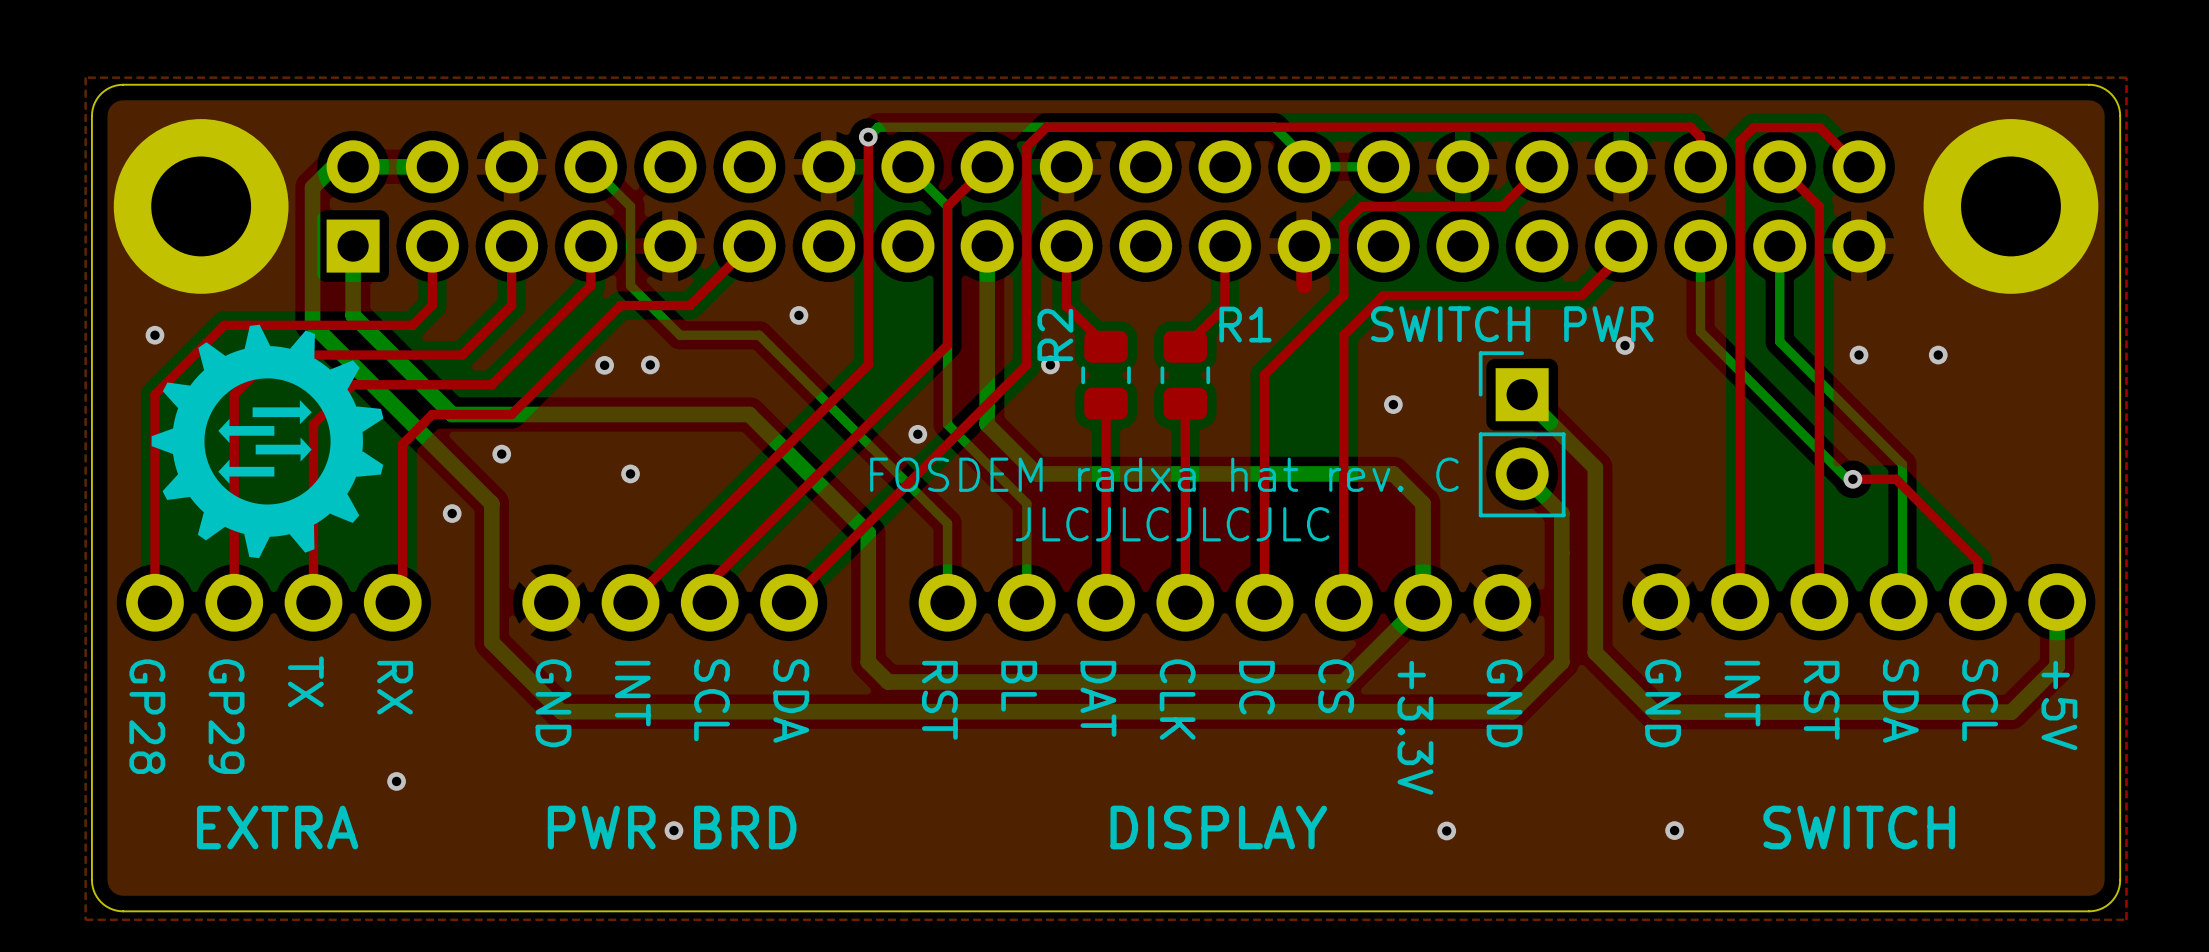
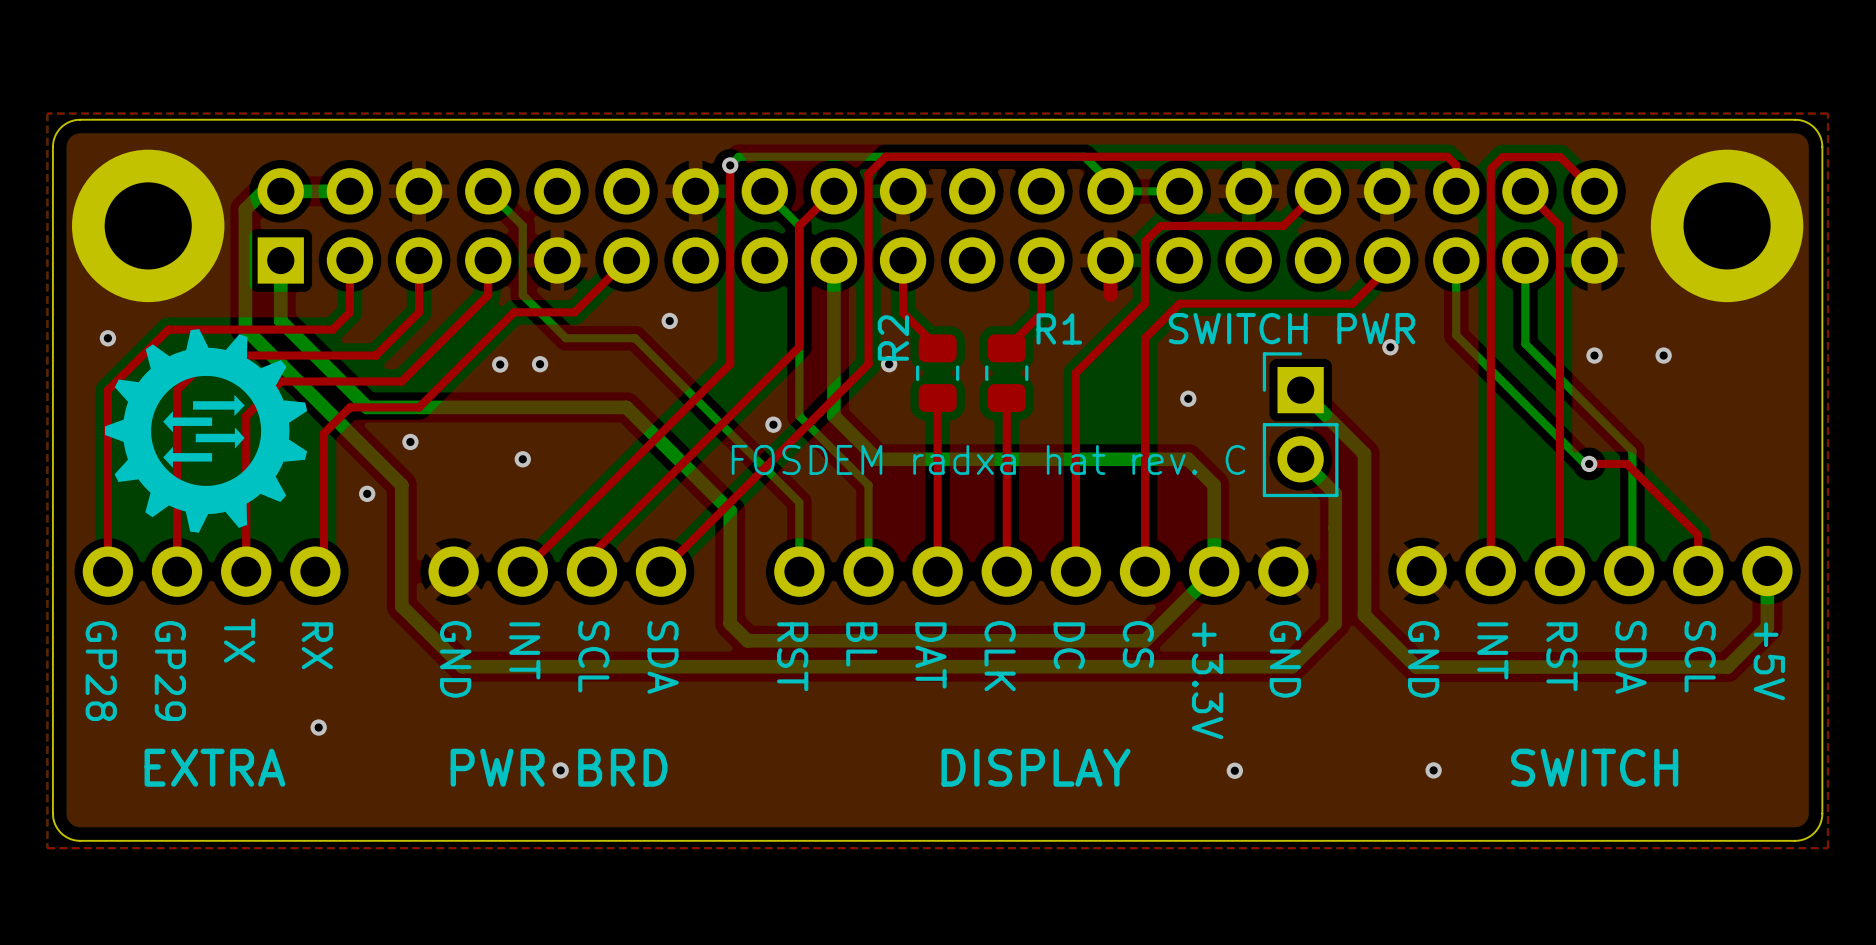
text: JLCJLCJLCJLC (1172, 524) -> none

